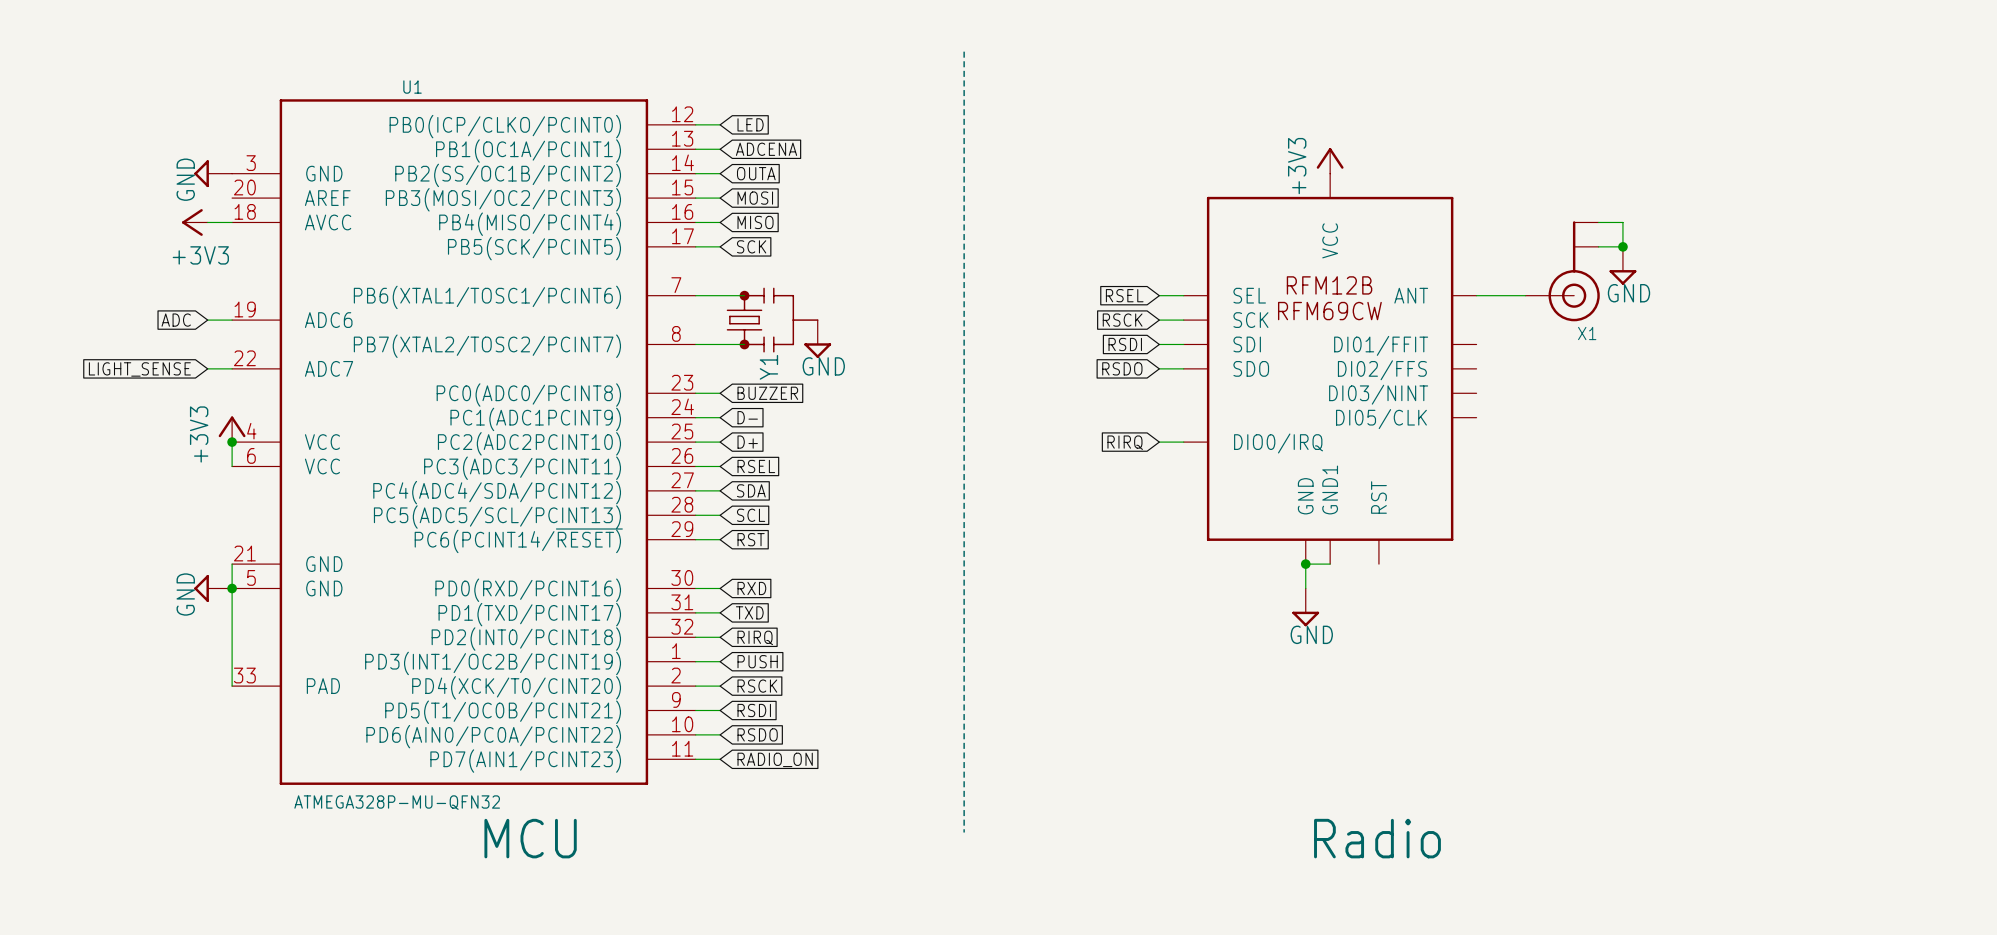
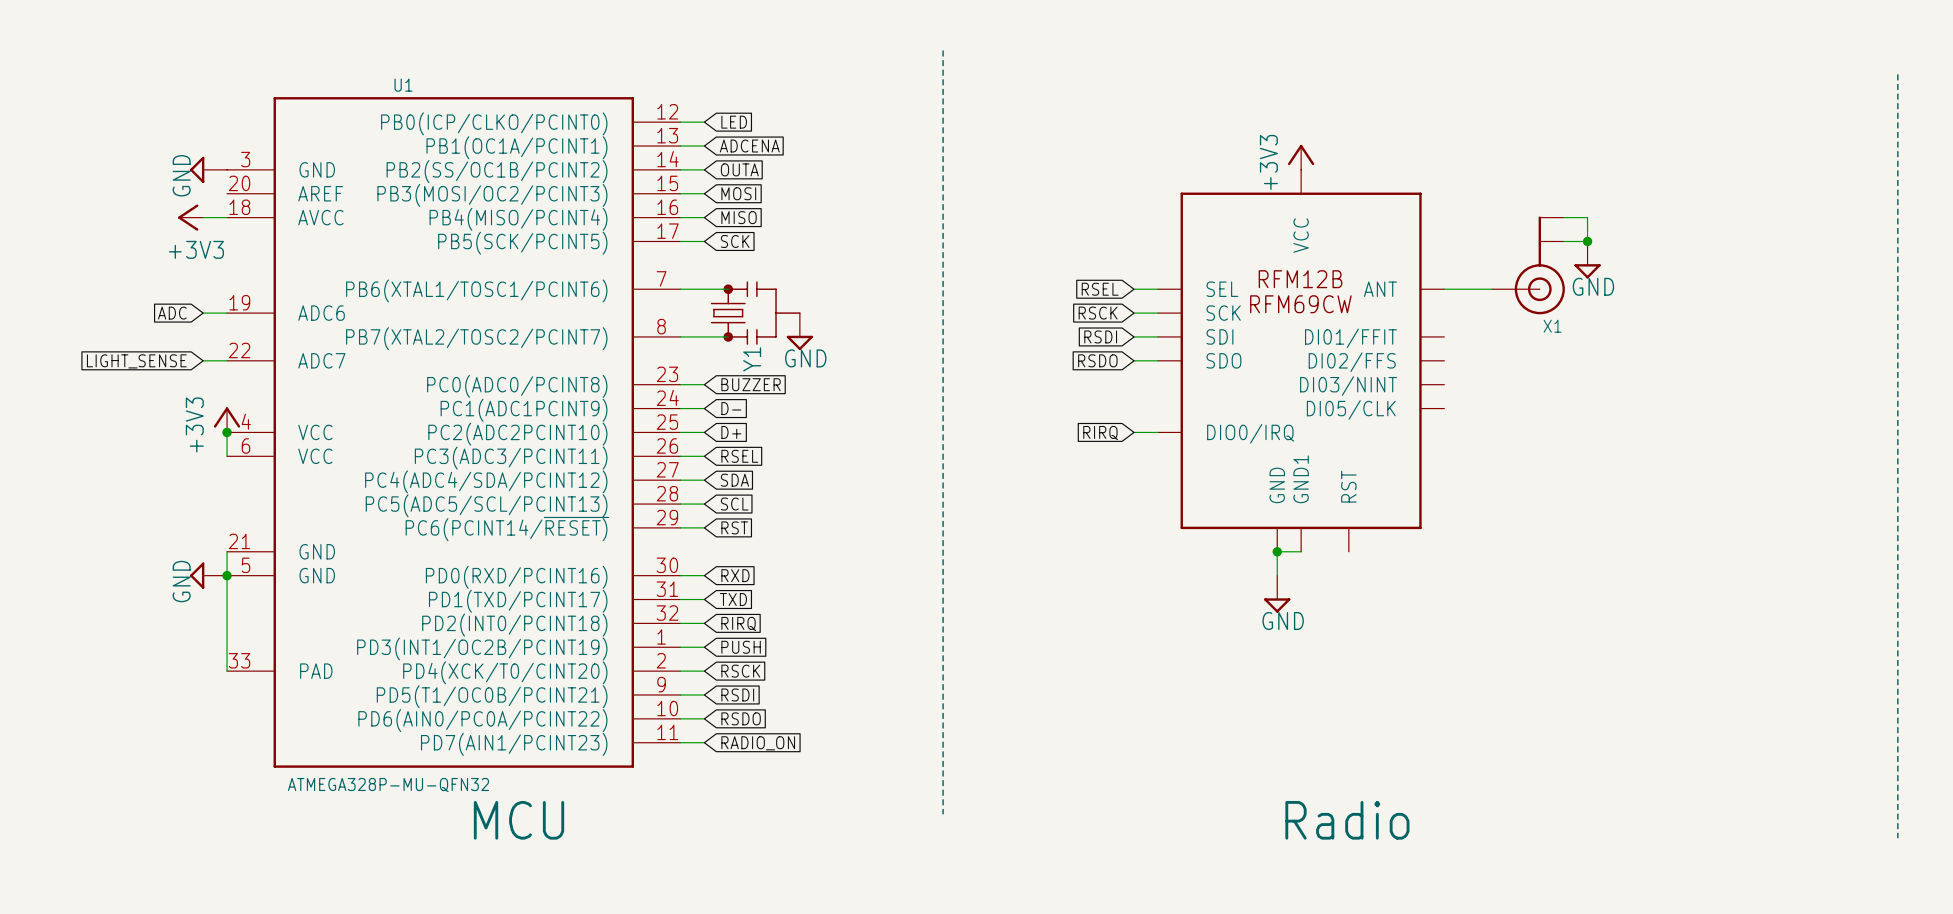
line: none -> (1897, 74) (1897, 838)

